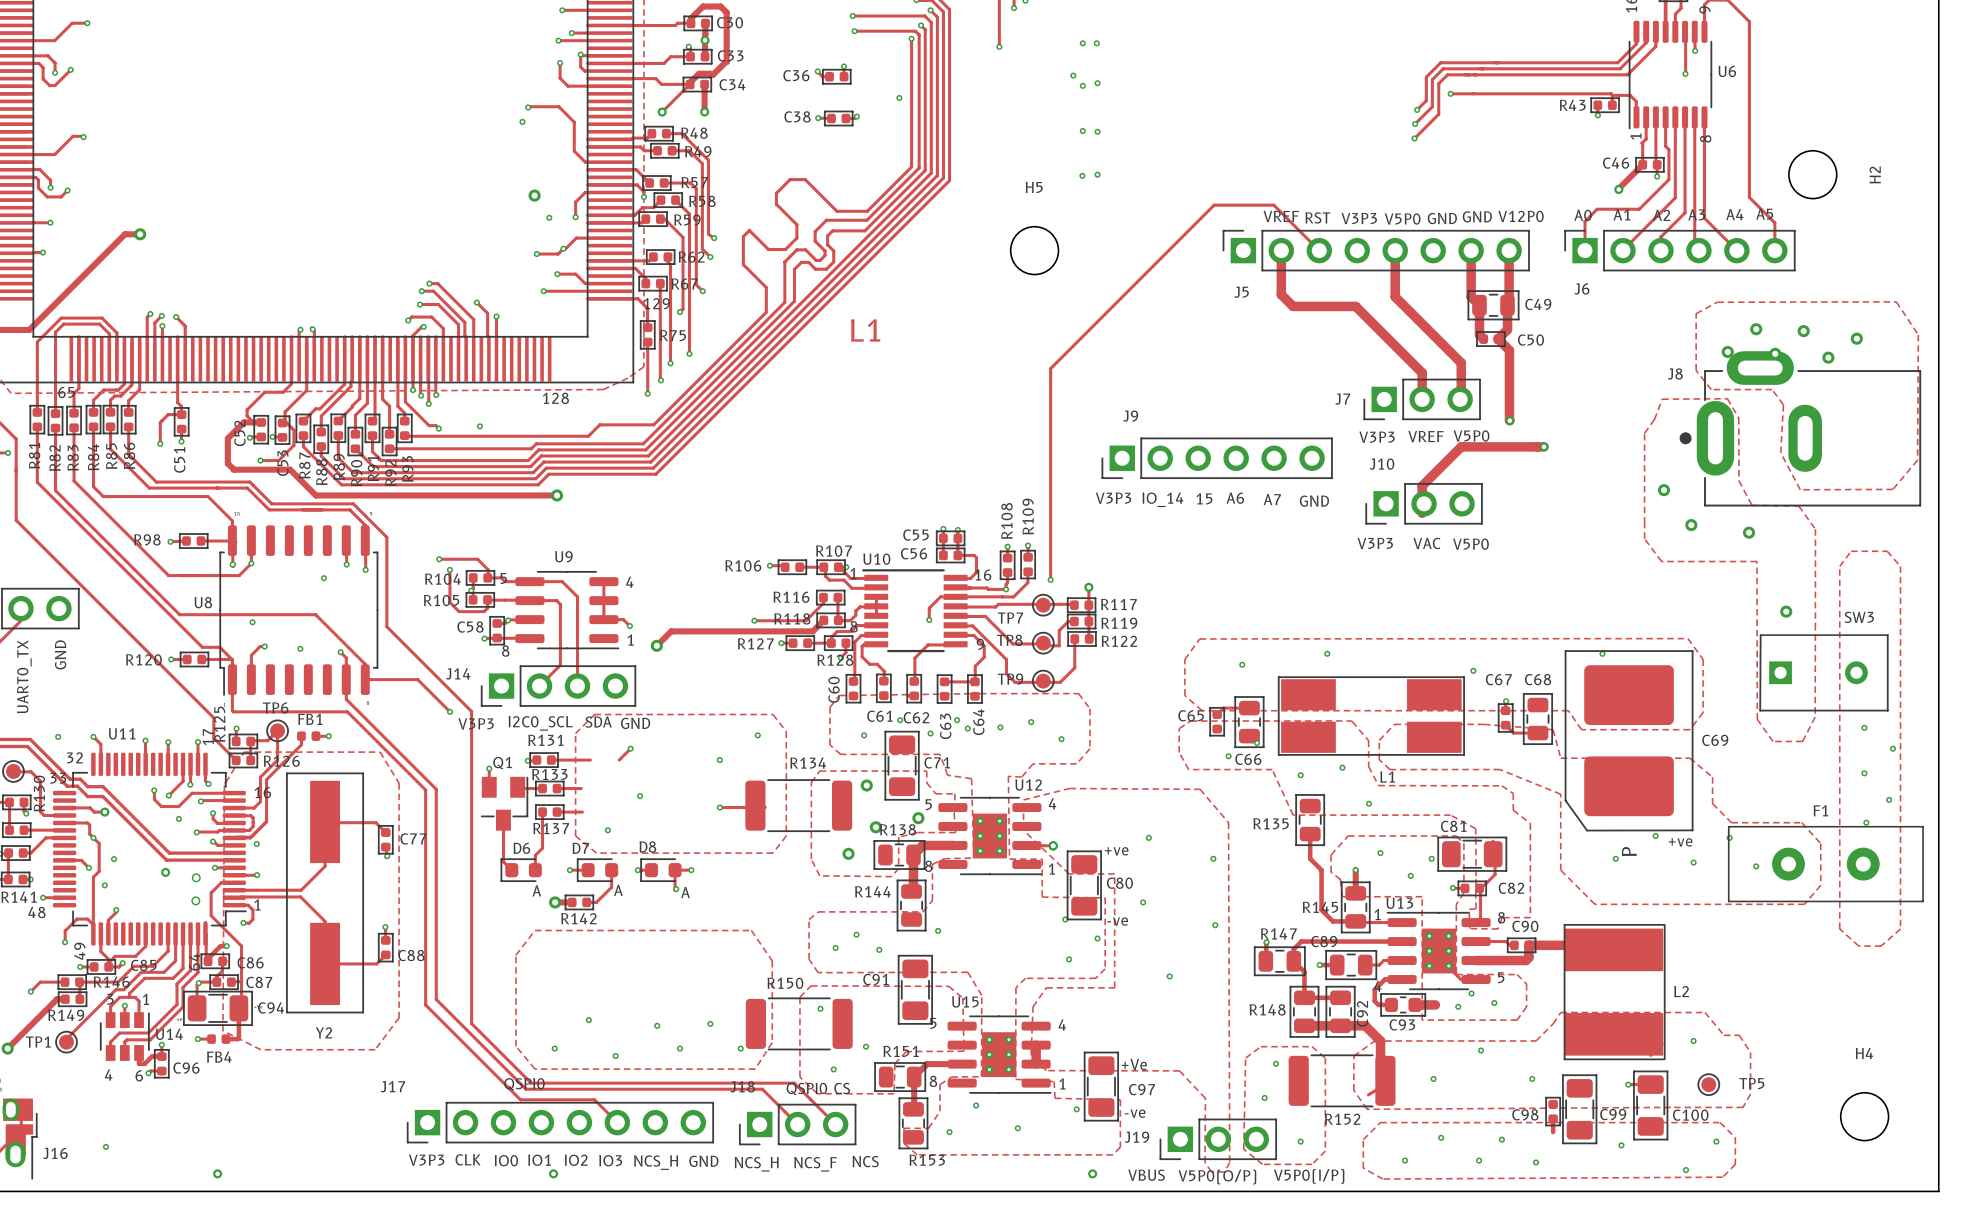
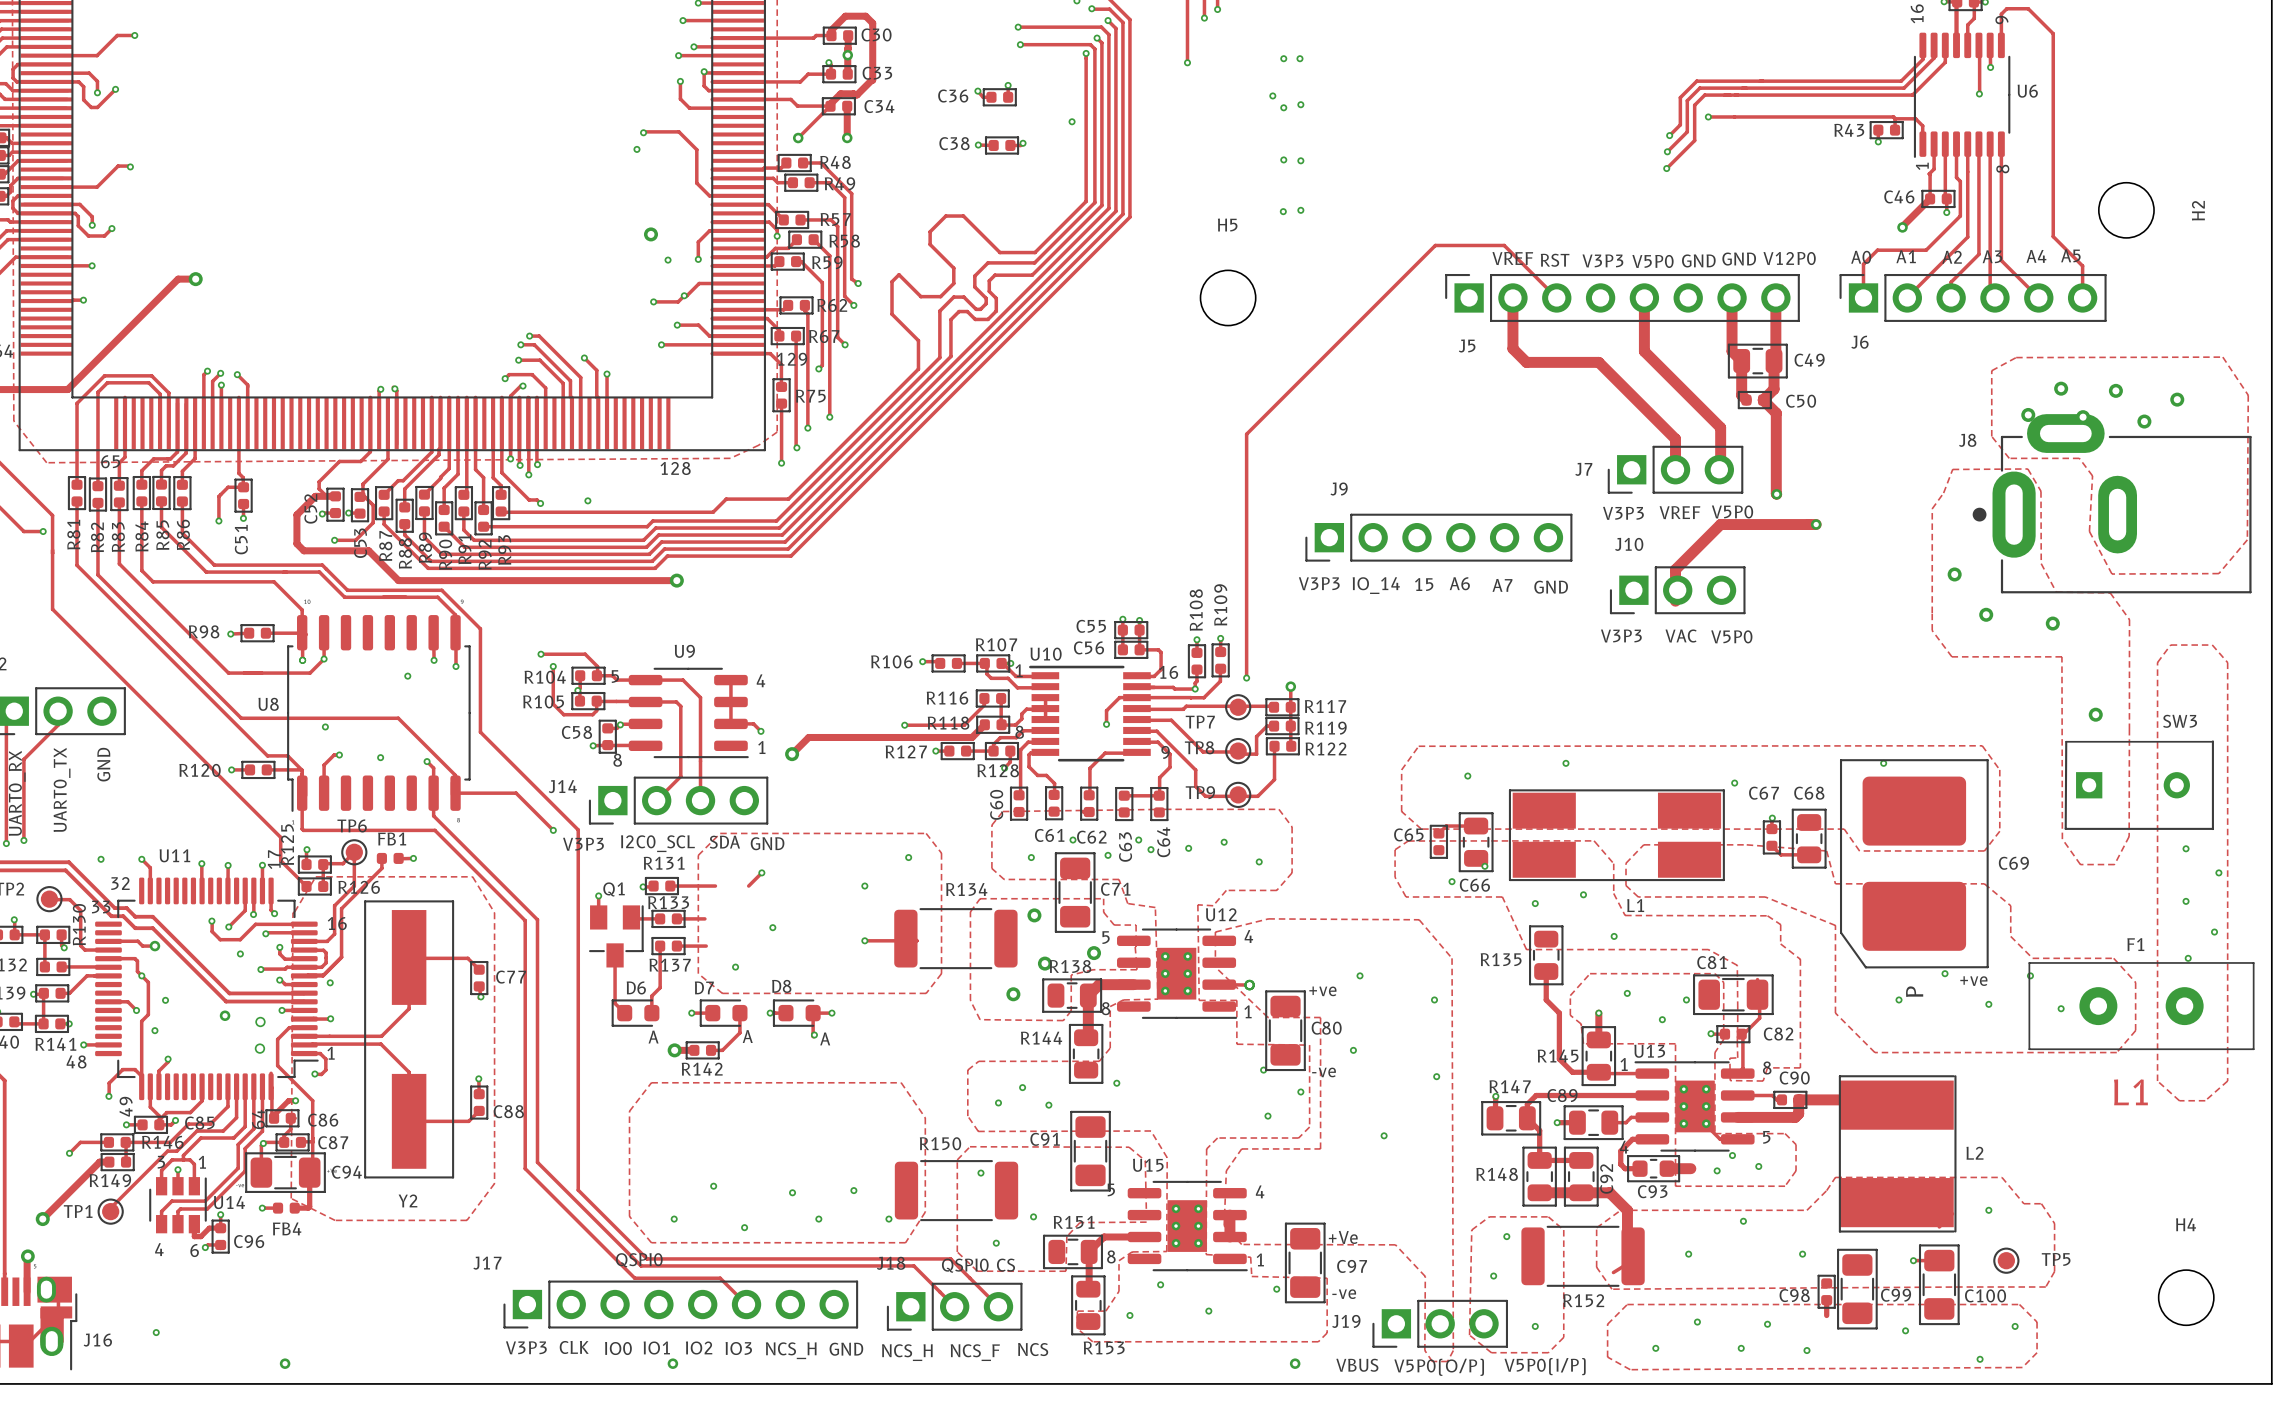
text: L1 (865, 330) -> none
text: none -> L1 (2130, 1092)

